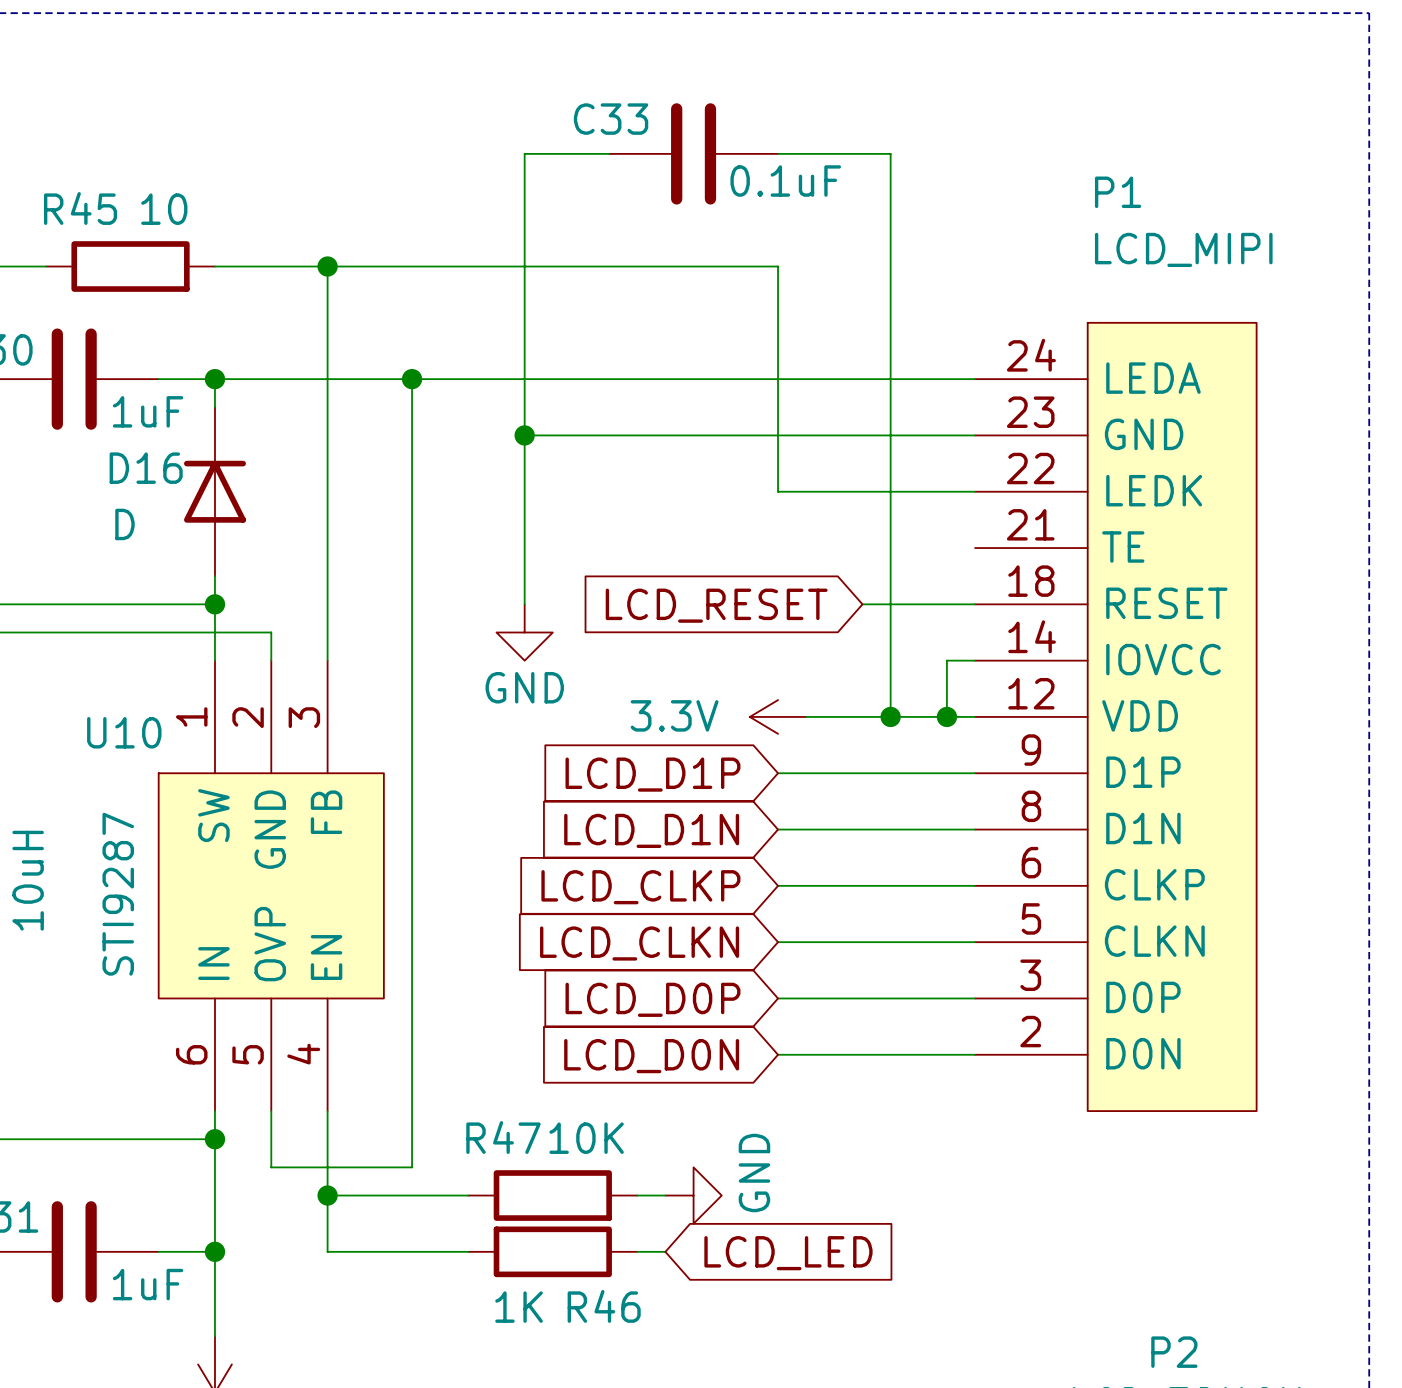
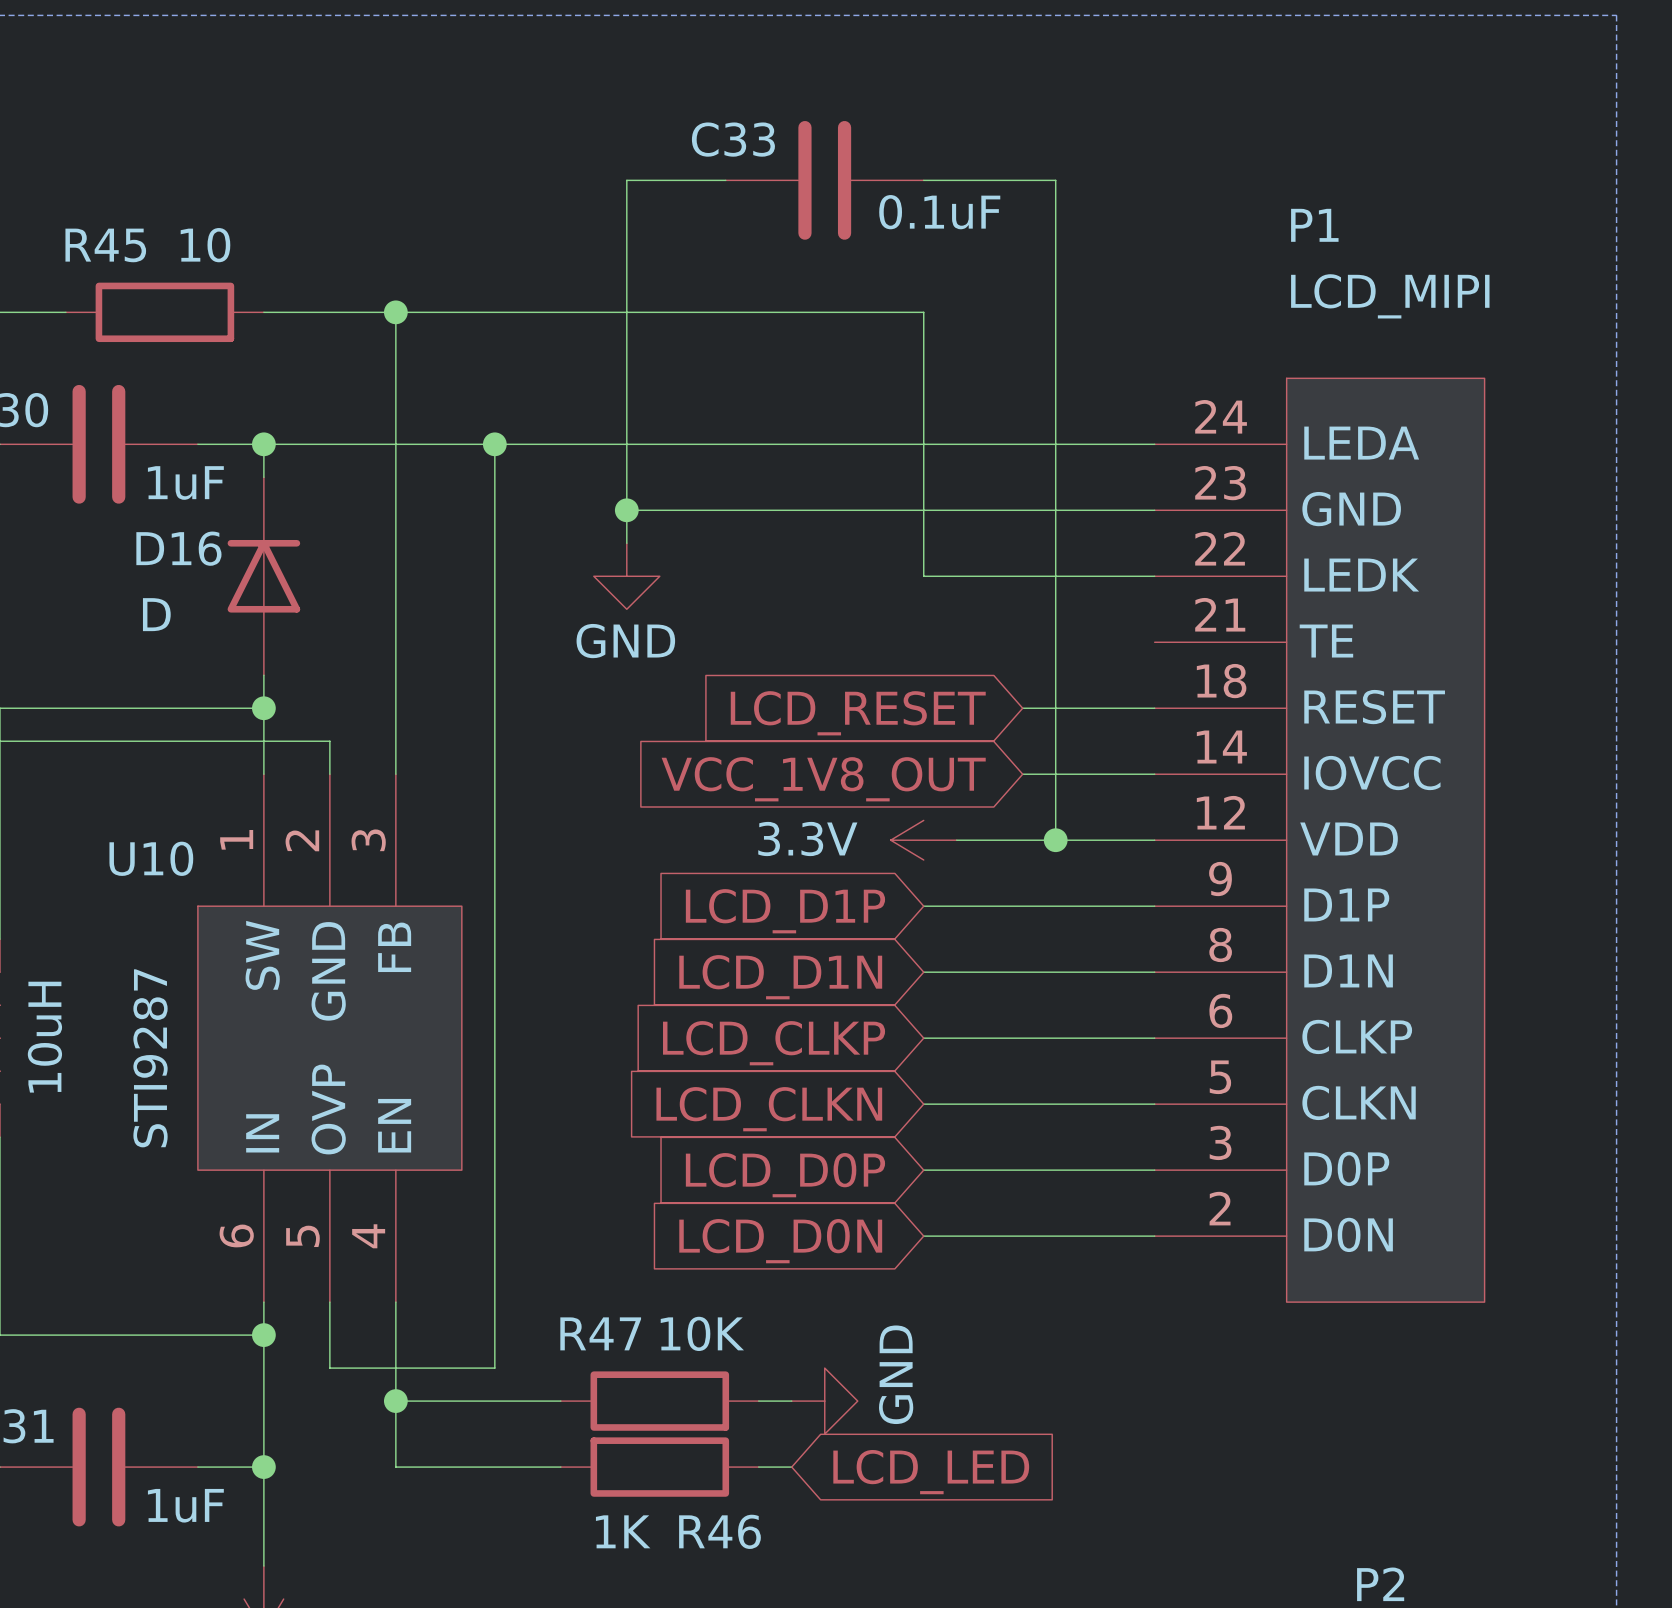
wire: (524, 463) (524, 604) -> none
power symbol position: GND (524, 632) -> GND (626, 576)
wire: (946, 660) (946, 716) -> (1121, 774) (1022, 774)
global label: none -> VCC_1V8_OUT (823, 779)
junction: (946, 716) -> none

